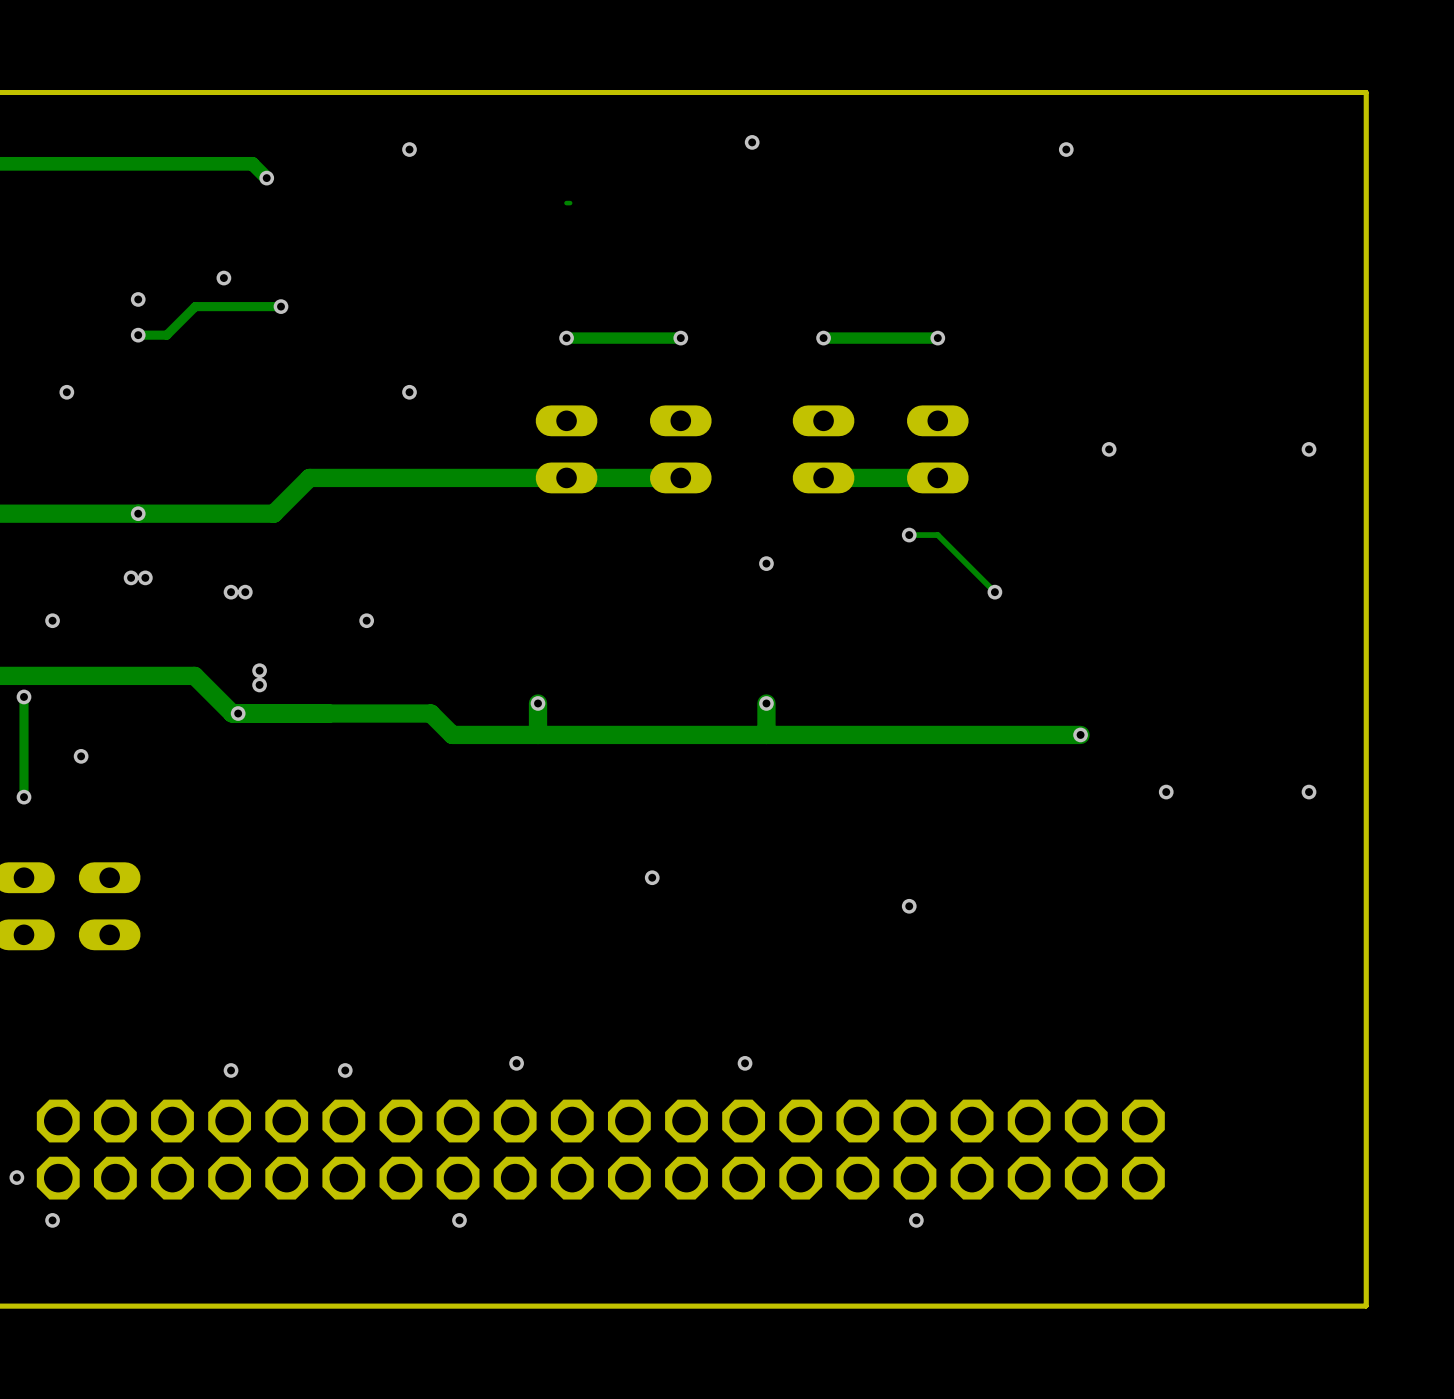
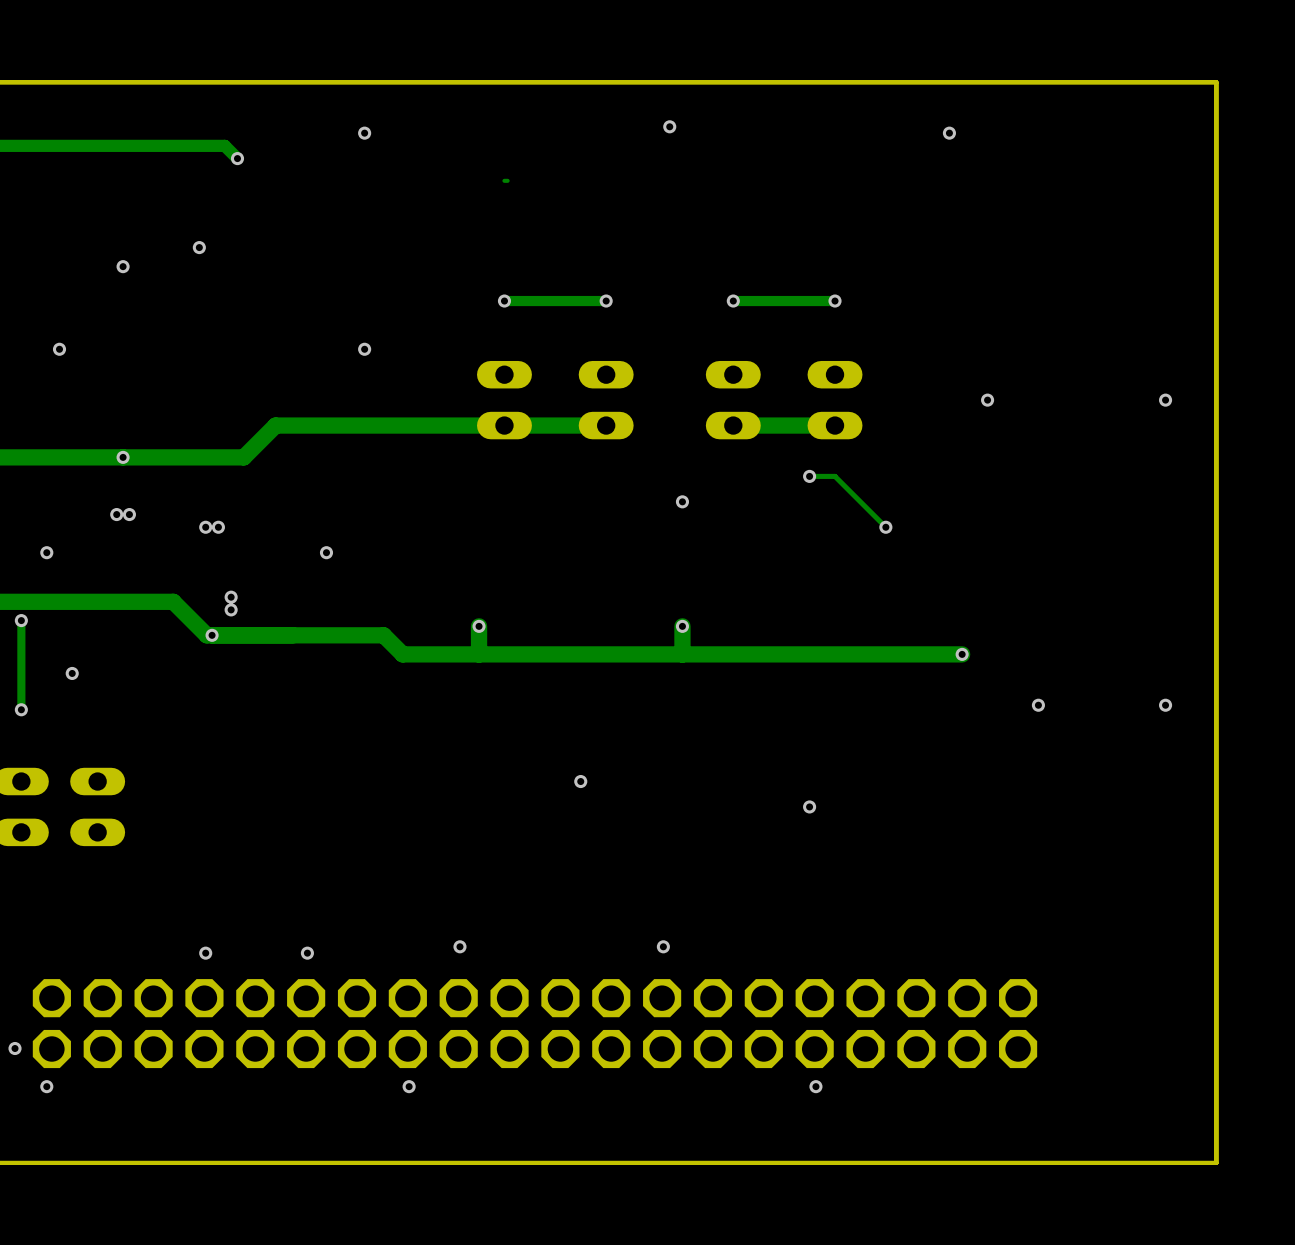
track: (281, 306) (195, 306) (166, 335) (138, 335) -> none
via: (281, 306) -> none
via: (138, 335) -> none

